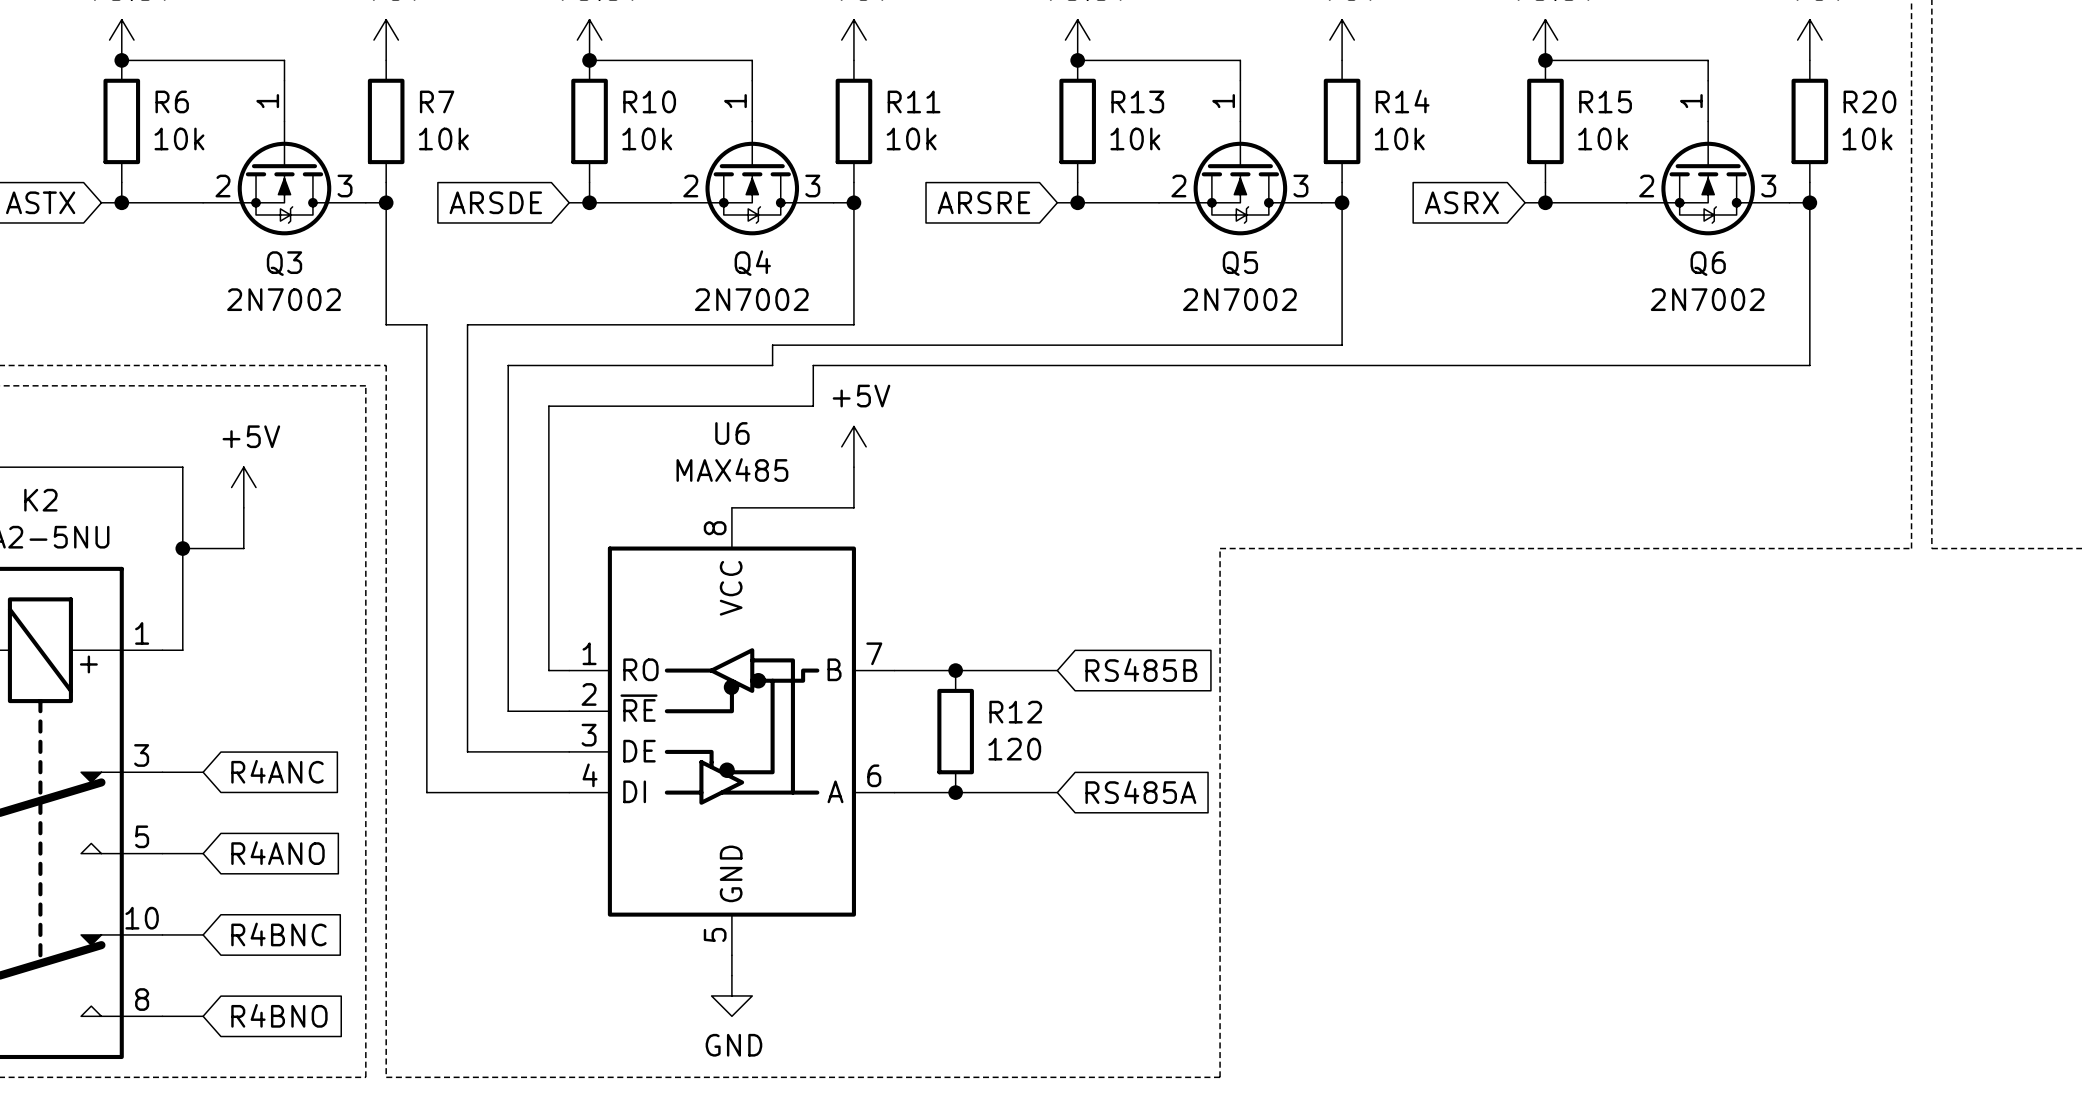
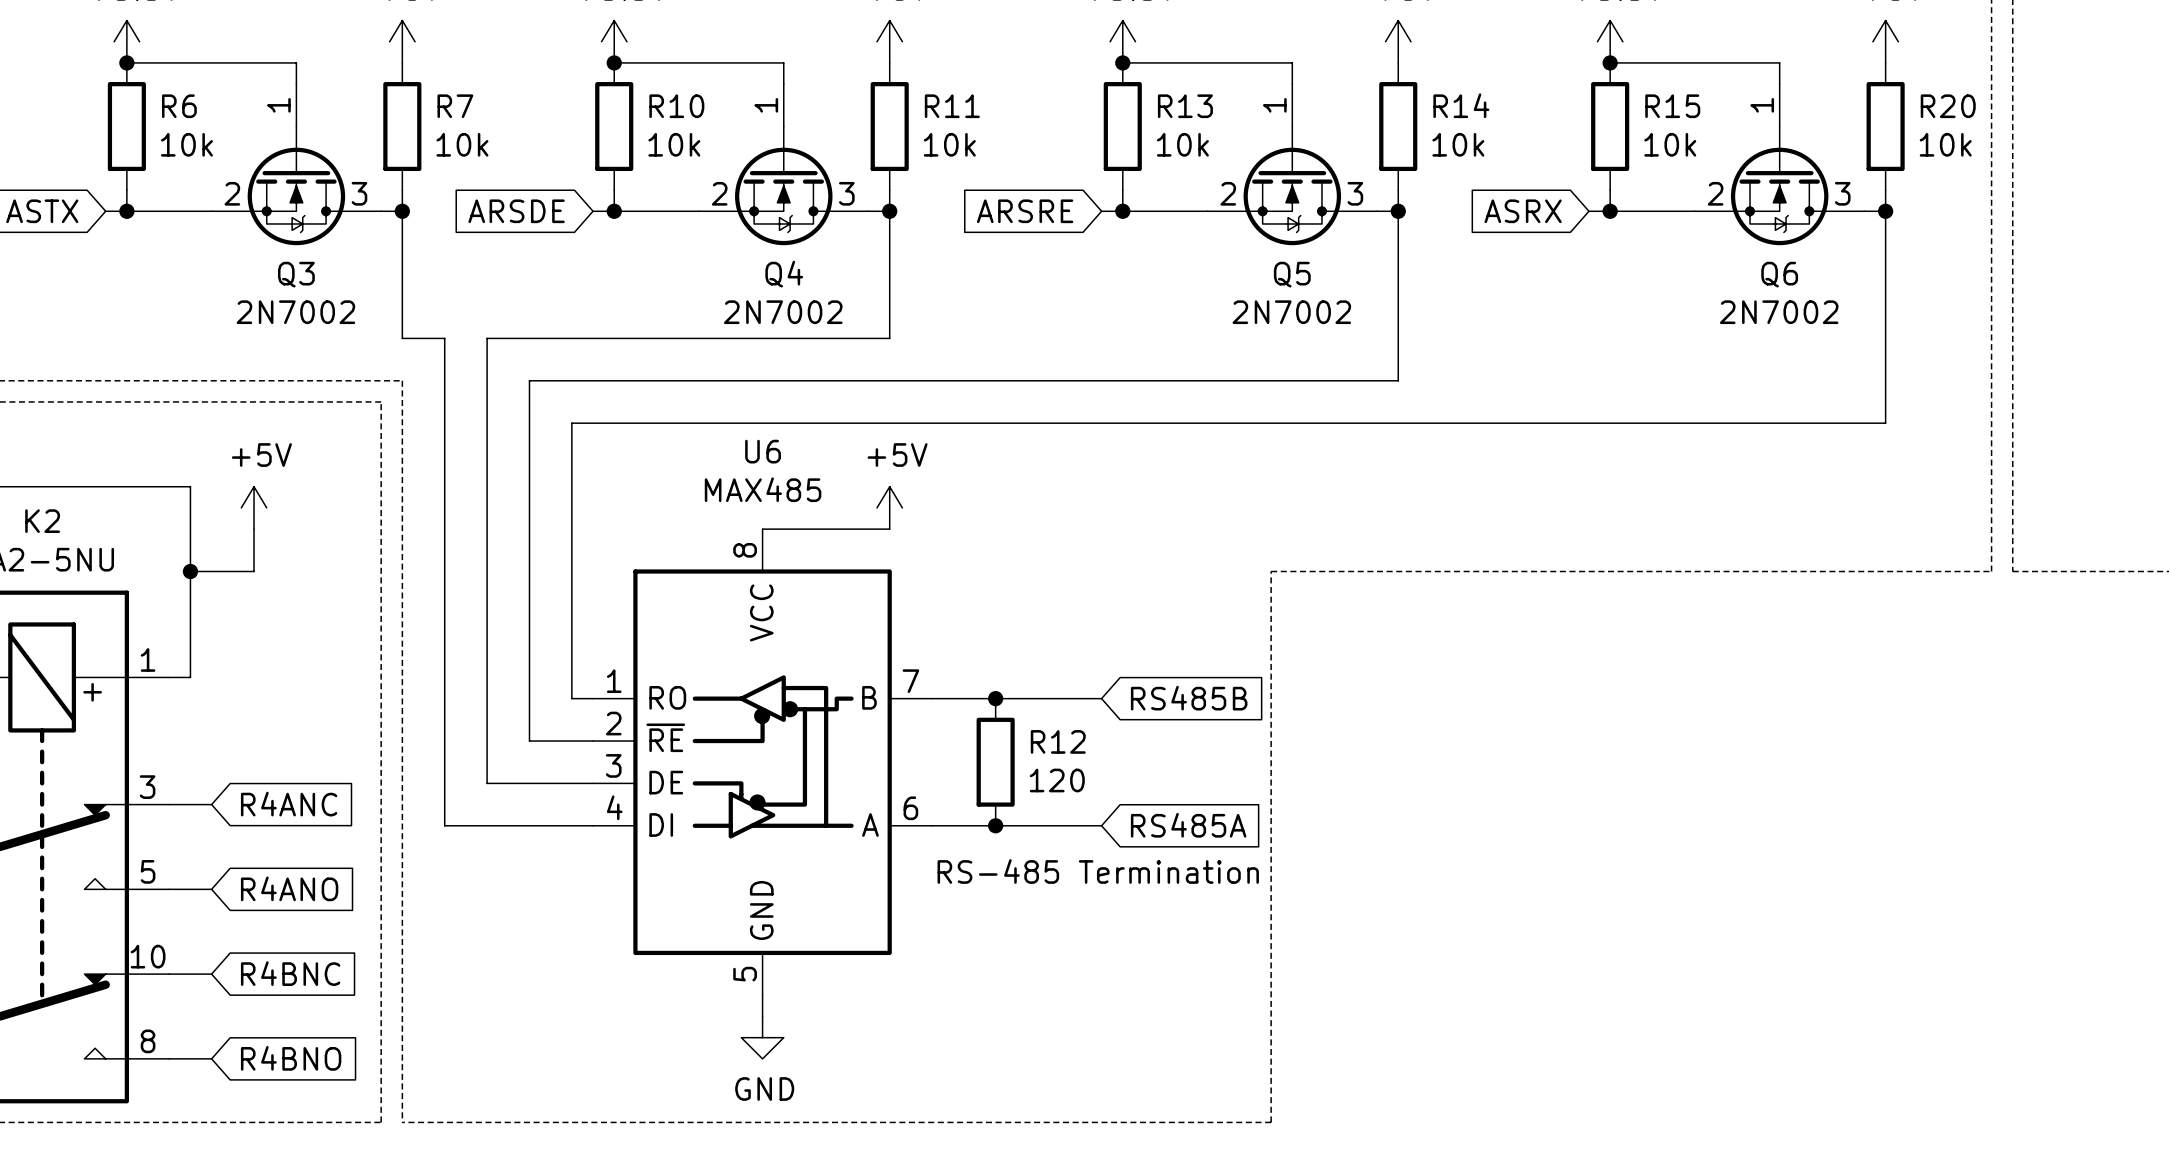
wire: (1342, 345) (772, 345) (772, 365) -> none
wire: (813, 365) (813, 406) -> (847, 380) (804, 380)
wire: (1342, 365) (1809, 365) -> (1398, 380) (1398, 359)
wire: none -> (1885, 380) (1885, 423) (847, 423)
power symbol position: +5V (853, 446) -> +5V (889, 507)
text: none -> RS-485 Termination (1098, 871)

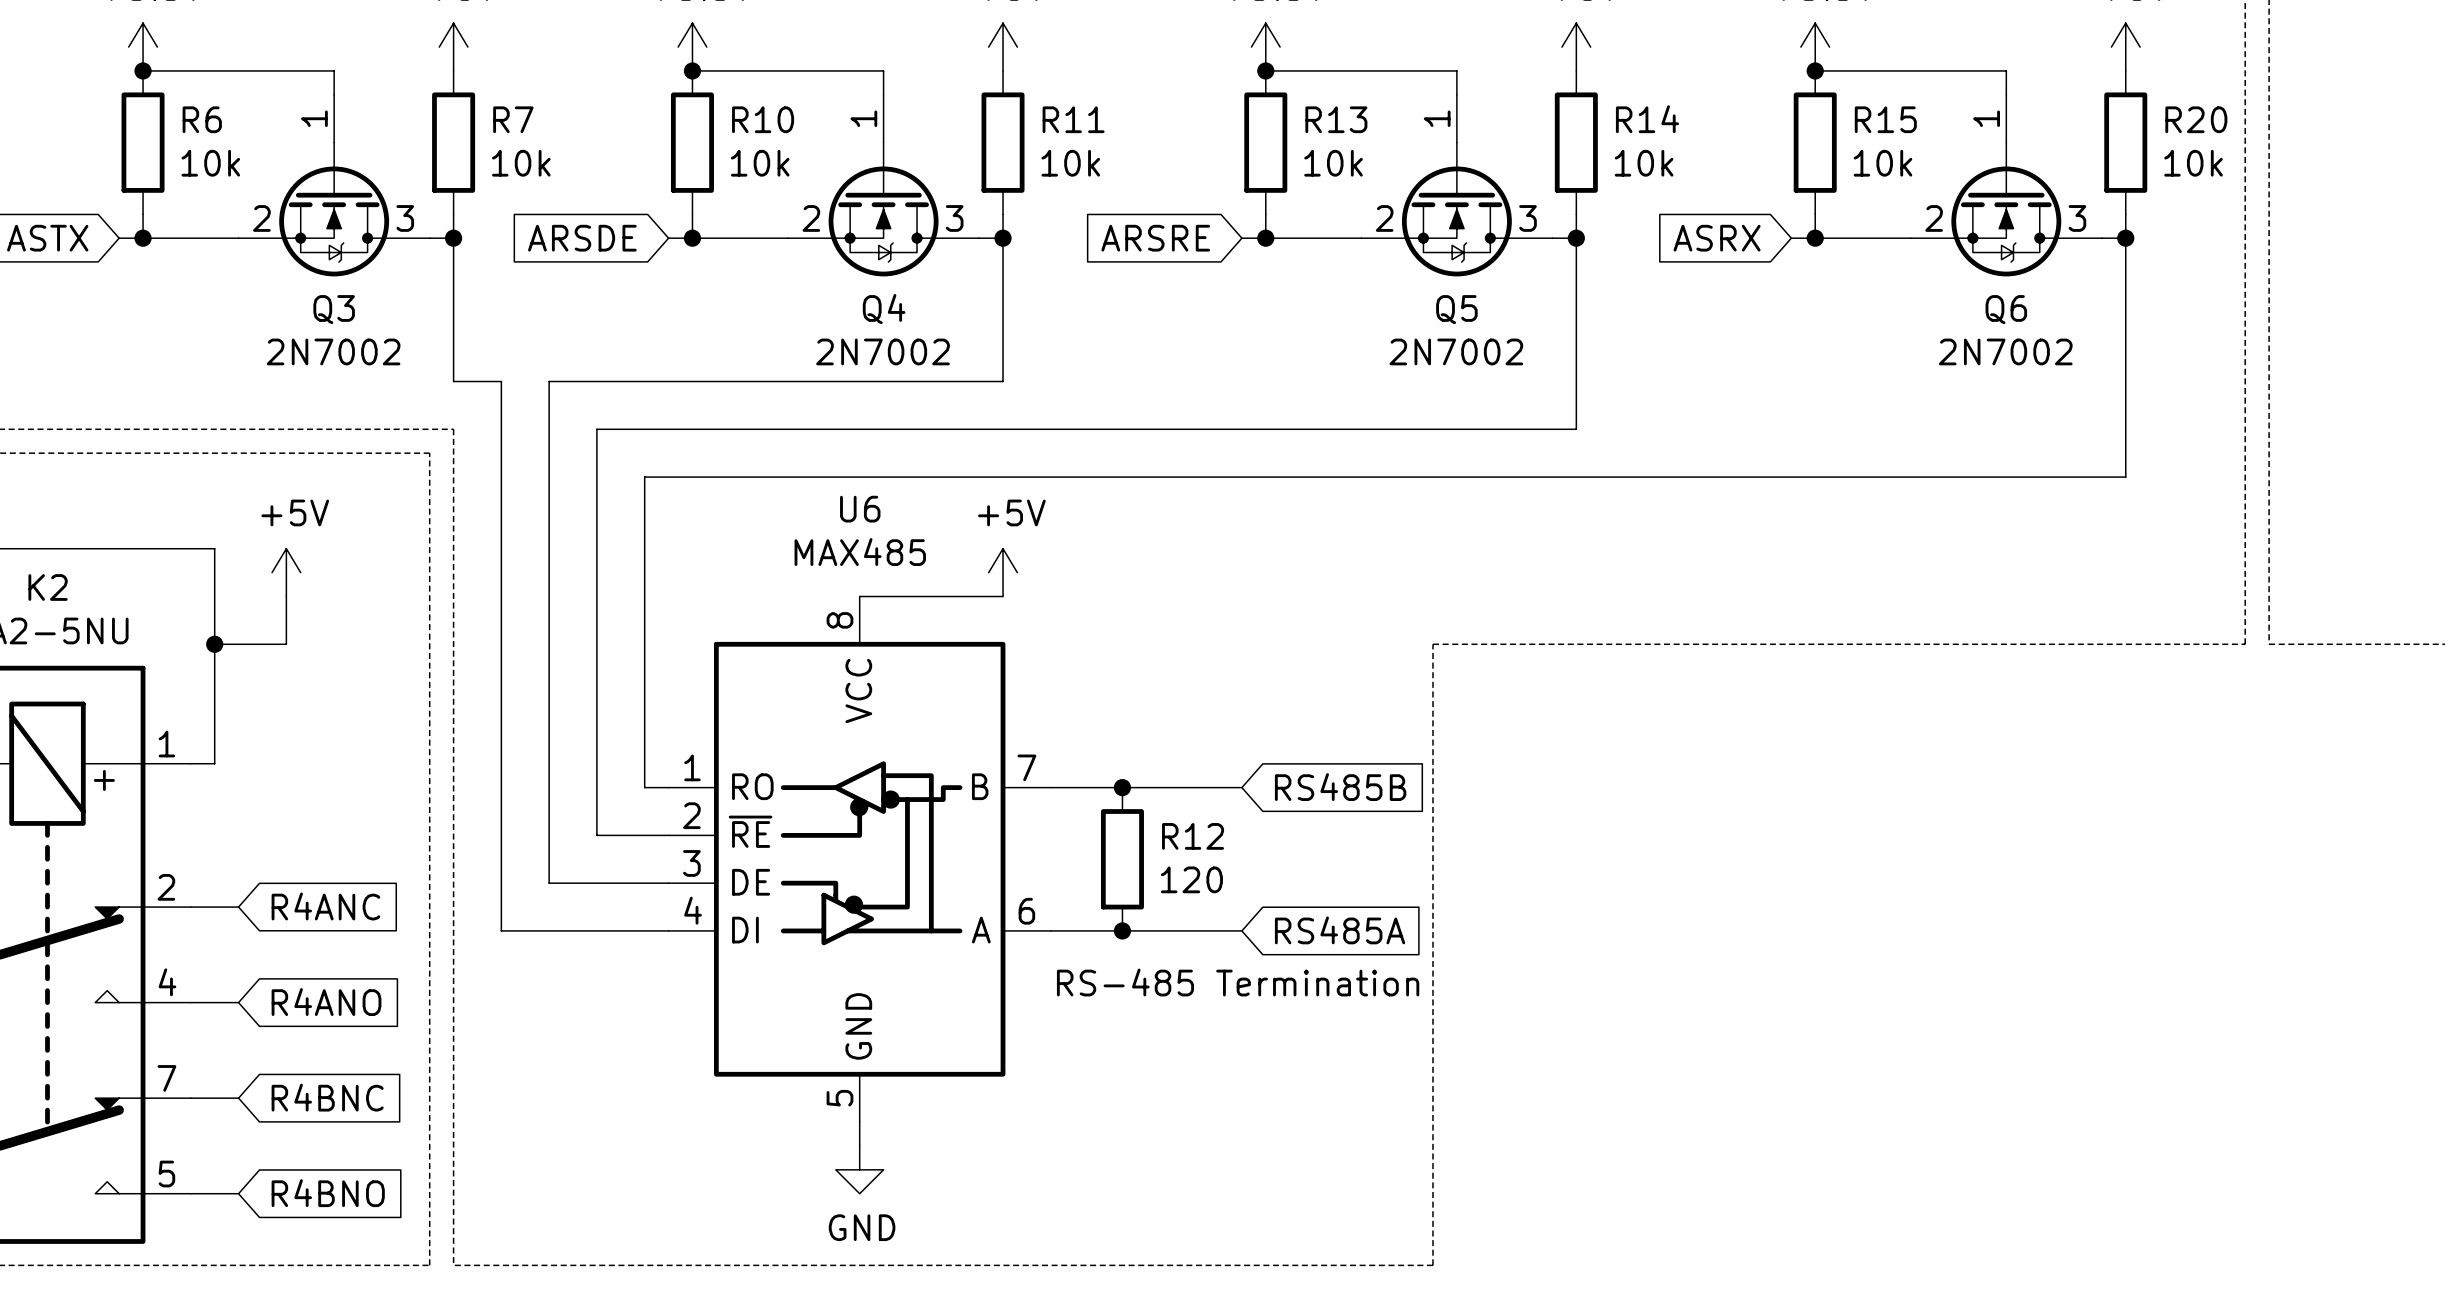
K2 pin number: 3 (147, 787) -> 2 (166, 887)
K2 pin number: 5 (148, 871) -> 4 (167, 982)
K2 pin number: 10 (148, 956) -> 7 (166, 1078)
K2 pin number: 8 (148, 1041) -> 5 (166, 1174)

